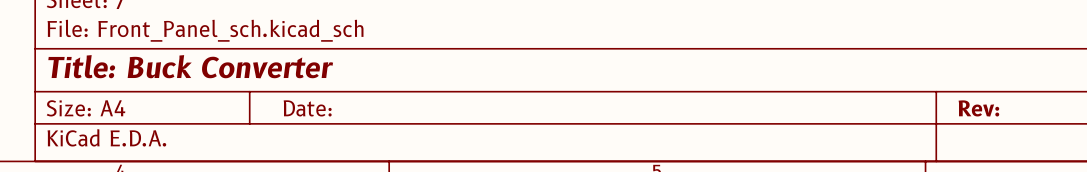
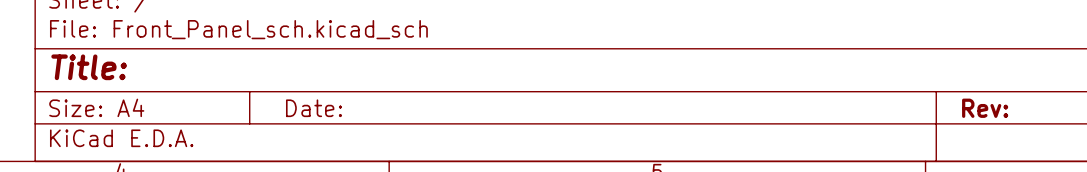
title block: Title: Buck Converter (190, 66) -> Title: (89, 67)

